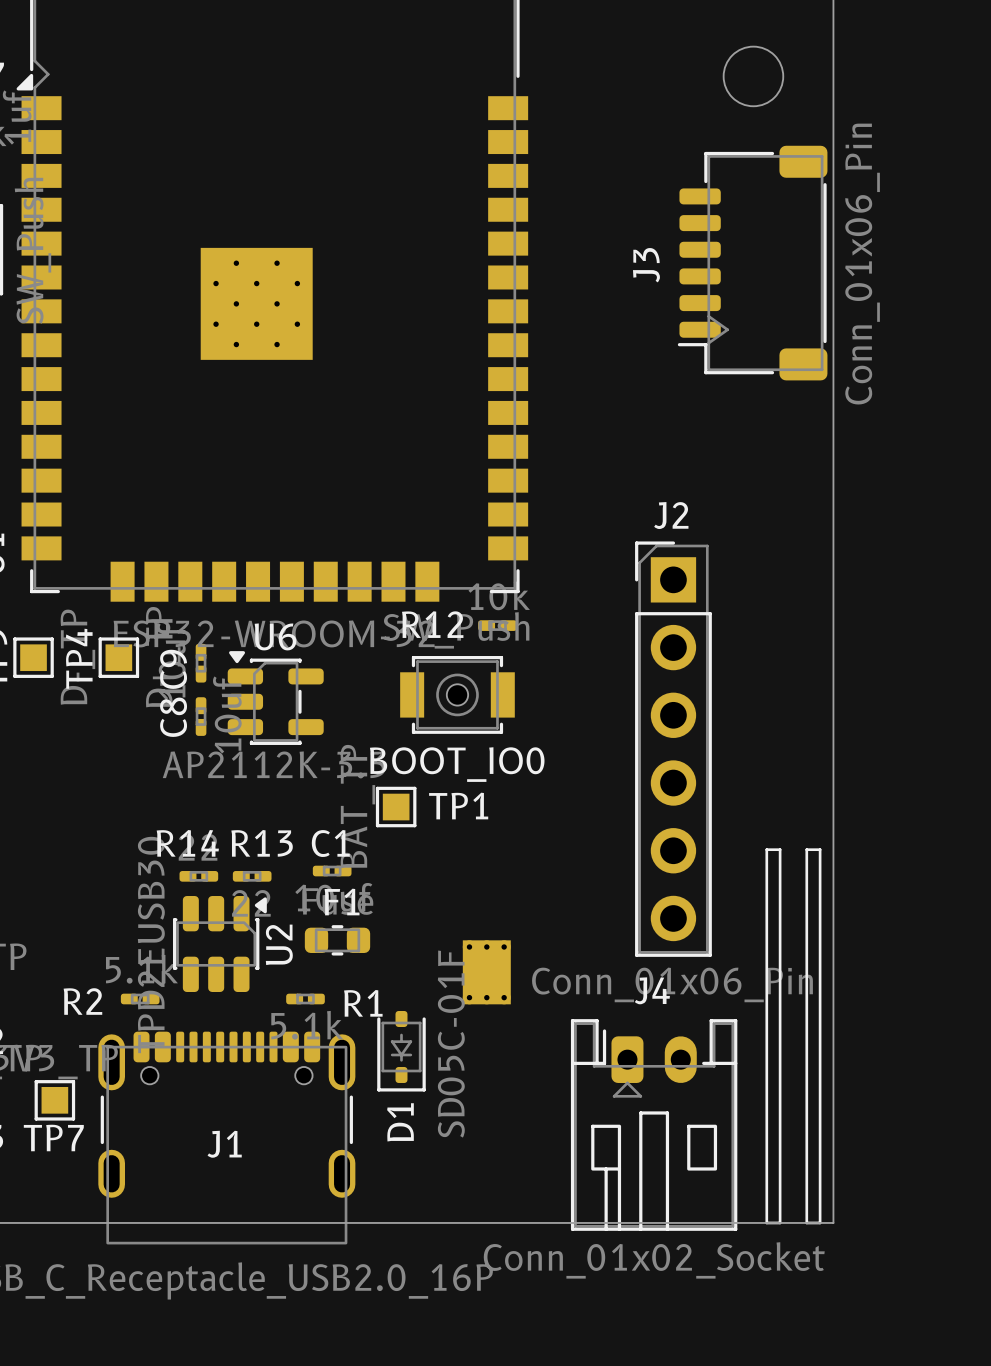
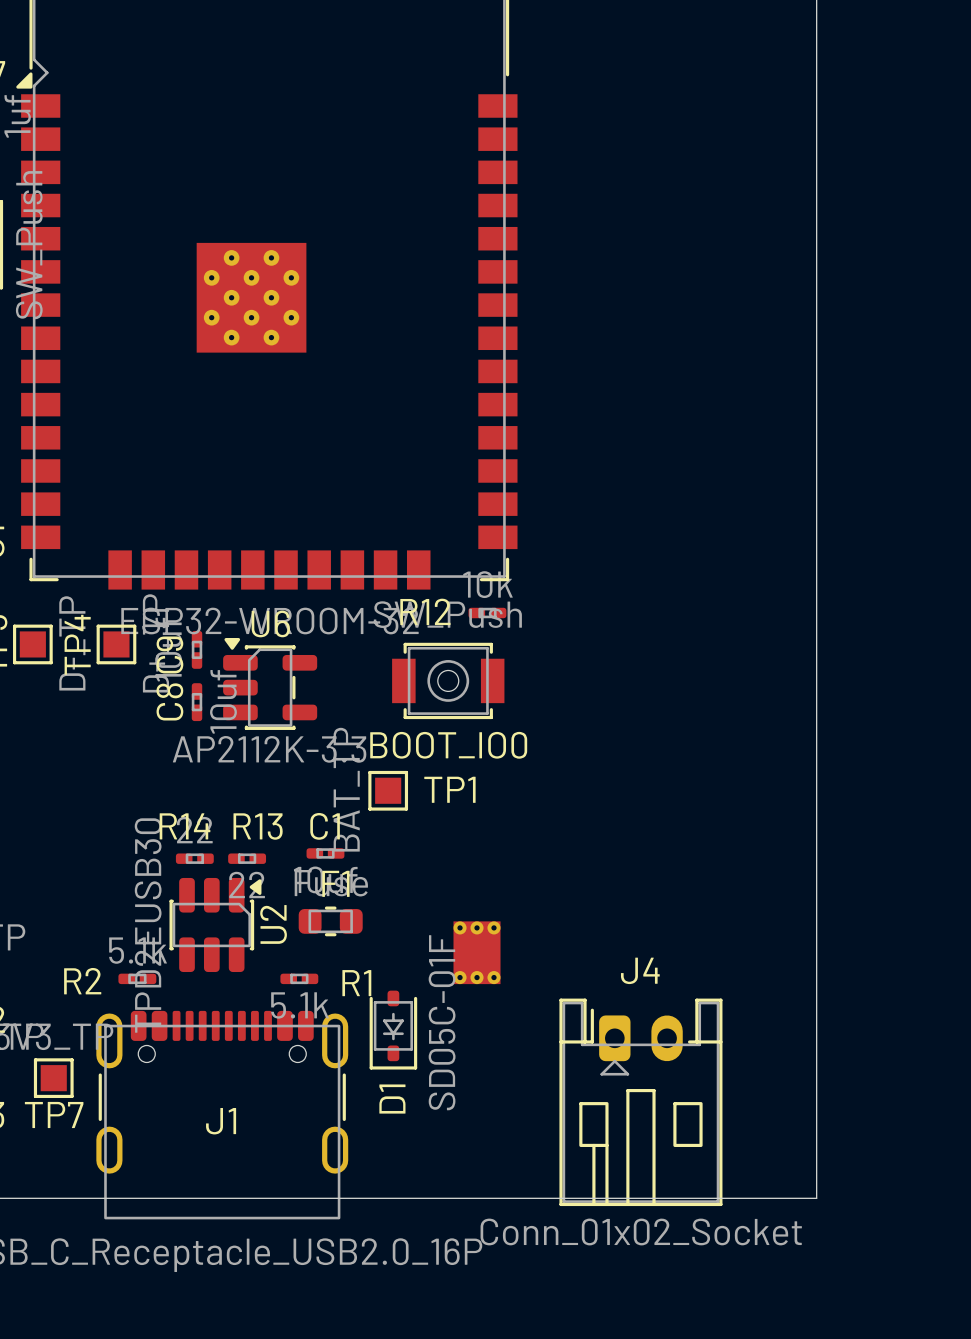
round board edge: [722, 45, 784, 107] -> none
J3: Conn_01x06_Pin (752, 263) -> none
J2: Conn_01x06_Pin (673, 749) -> none
line: (766, 849) (780, 849) (780, 1222) (766, 1222) (766, 849) -> none
line: (806, 849) (820, 849) (820, 1222) (806, 1222) (806, 849) -> none

